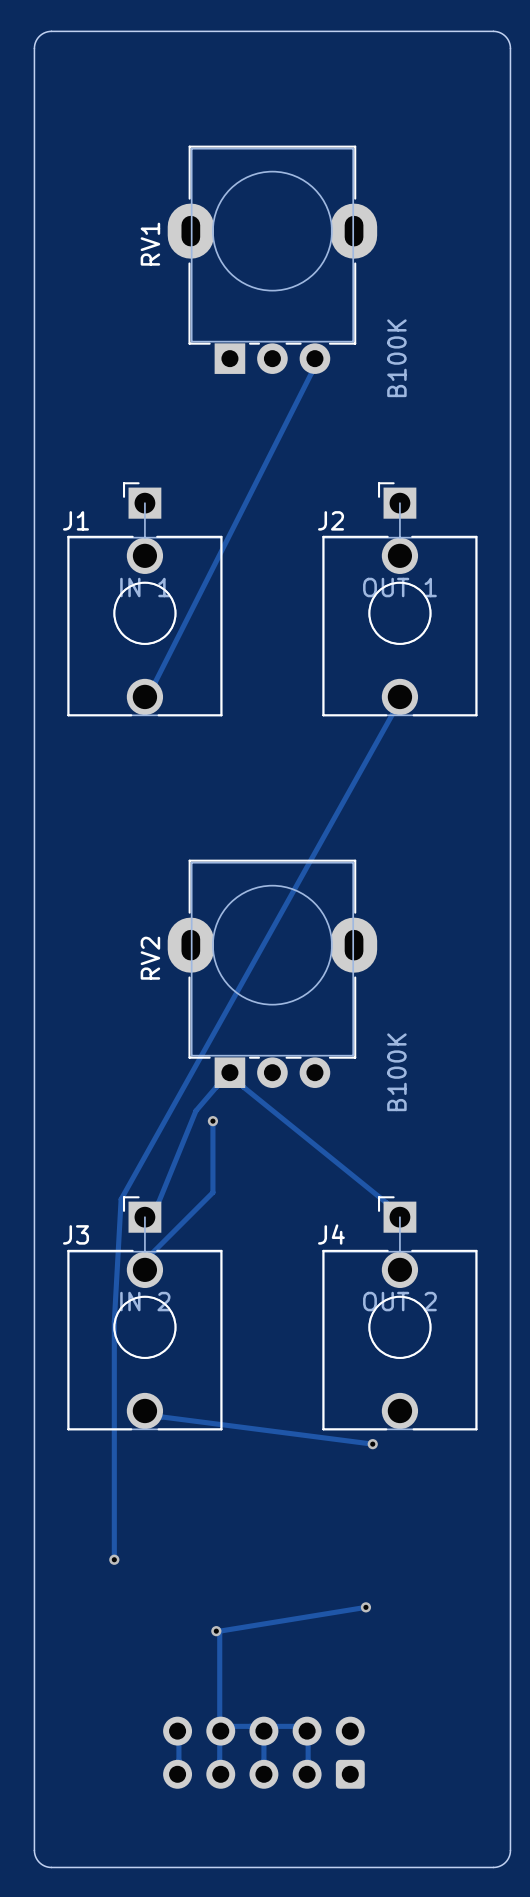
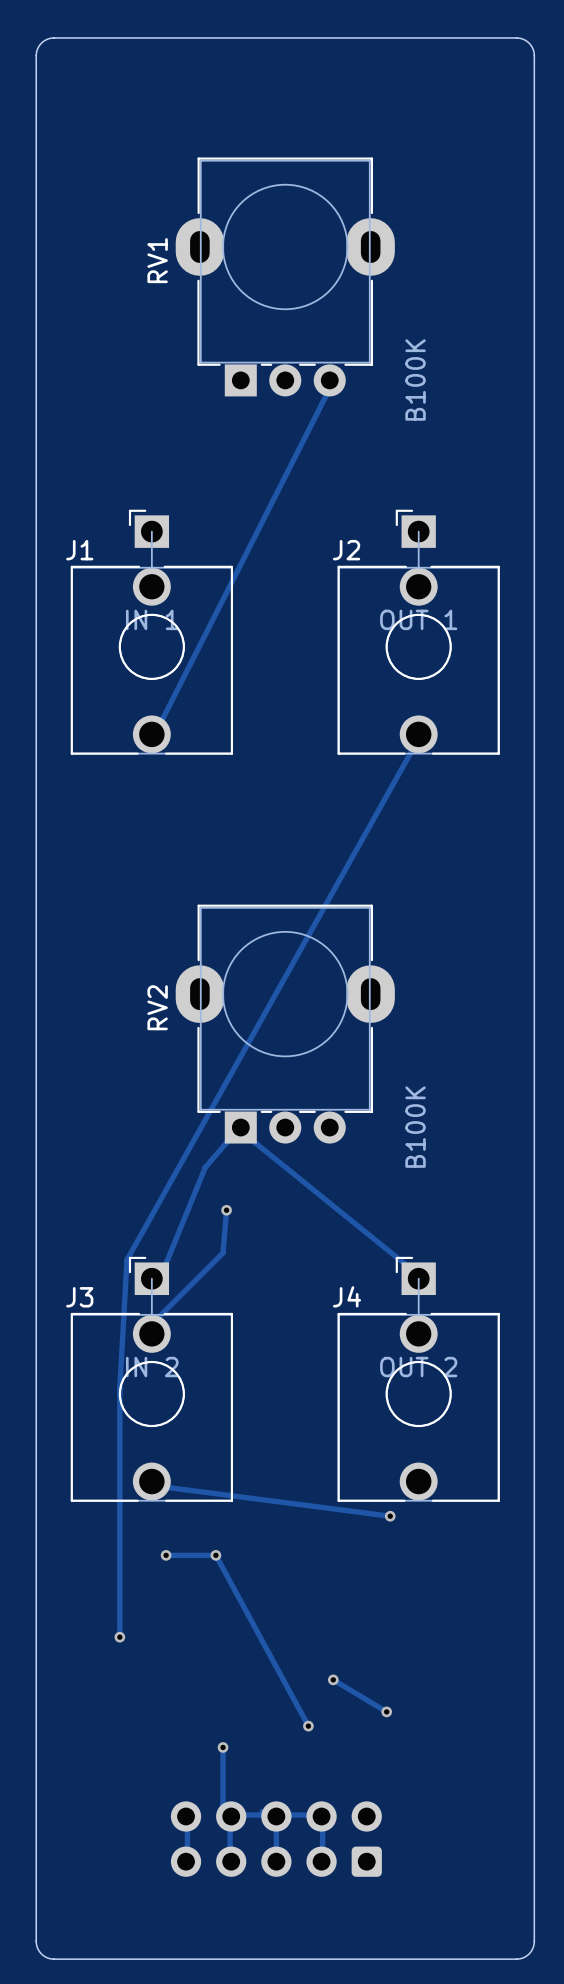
track: (212, 1121) (212, 1192) -> (226, 1210) (223, 1252)
via position: (212, 1121) -> (226, 1210)
track: none -> (166, 1555) (215, 1555) (308, 1726)
via: none -> (166, 1555)
via: none -> (215, 1555)
track: none -> (333, 1679) (386, 1711)
via: none -> (333, 1679)
track: (365, 1607) (219, 1631) -> none
via: (365, 1607) -> none
via position: (216, 1631) -> (223, 1747)
track: (219, 1631) (220, 1731) (233, 1726) (294, 1726) (307, 1731) -> (223, 1747) (223, 1804) (231, 1816) (321, 1816)
via: none -> (386, 1711)
via: none -> (308, 1726)

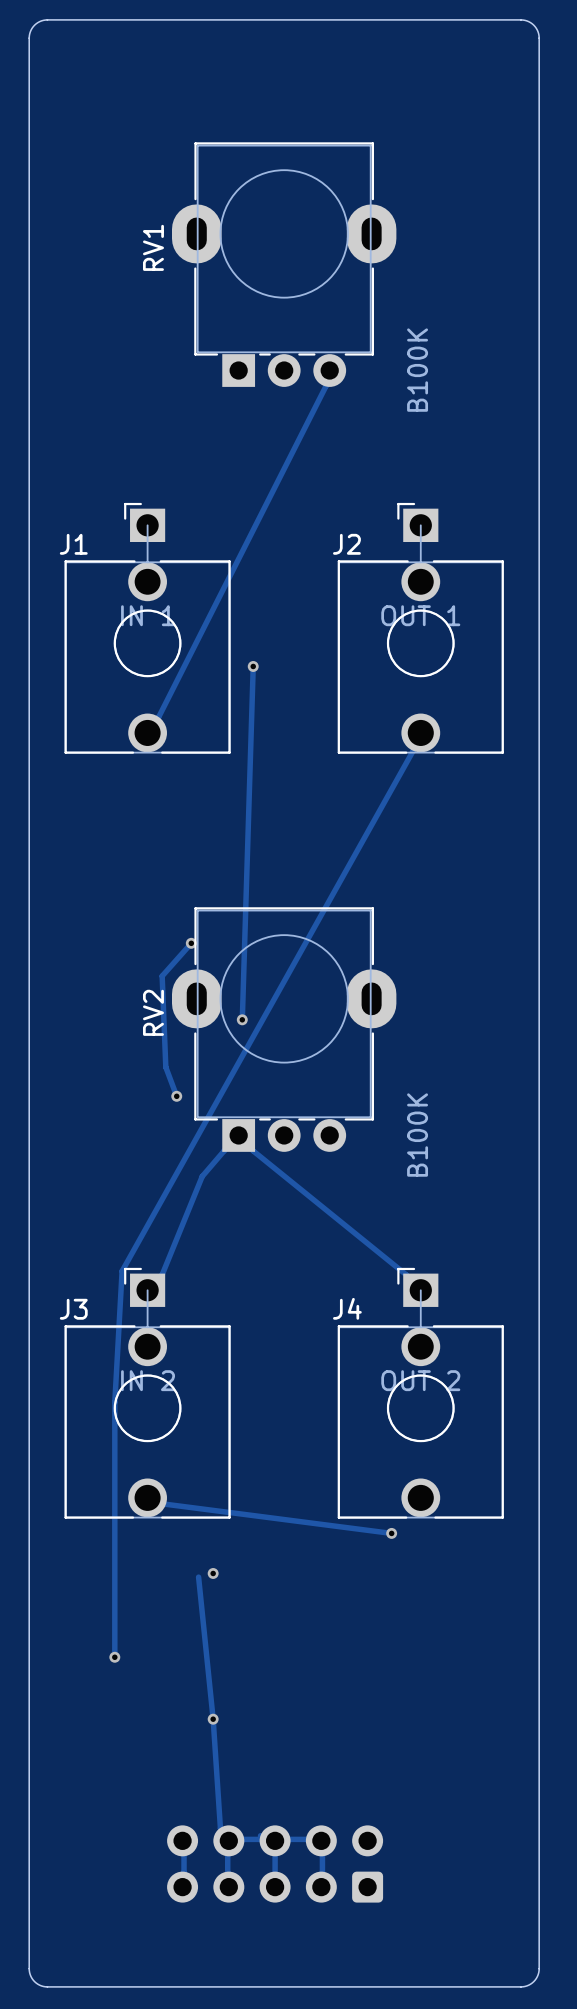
track: none -> (253, 666) (242, 1019)
via: none -> (253, 666)
track: none -> (191, 943) (162, 976) (165, 1067) (176, 1096)
via: none -> (191, 943)
via: none -> (242, 1019)
via: none -> (176, 1096)
track: (226, 1210) (223, 1252) (158, 1316) (151, 1333) -> none
via: (226, 1210) -> none
track: (166, 1555) (215, 1555) (308, 1726) -> none
via: (166, 1555) -> none
track: (333, 1679) (386, 1711) -> none
via: (333, 1679) -> none
via: none -> (213, 1719)
via: (386, 1711) -> none
via: (308, 1726) -> none
track: (223, 1747) (223, 1804) -> (198, 1577) (213, 1719) (220, 1828)
via: (223, 1747) -> none

